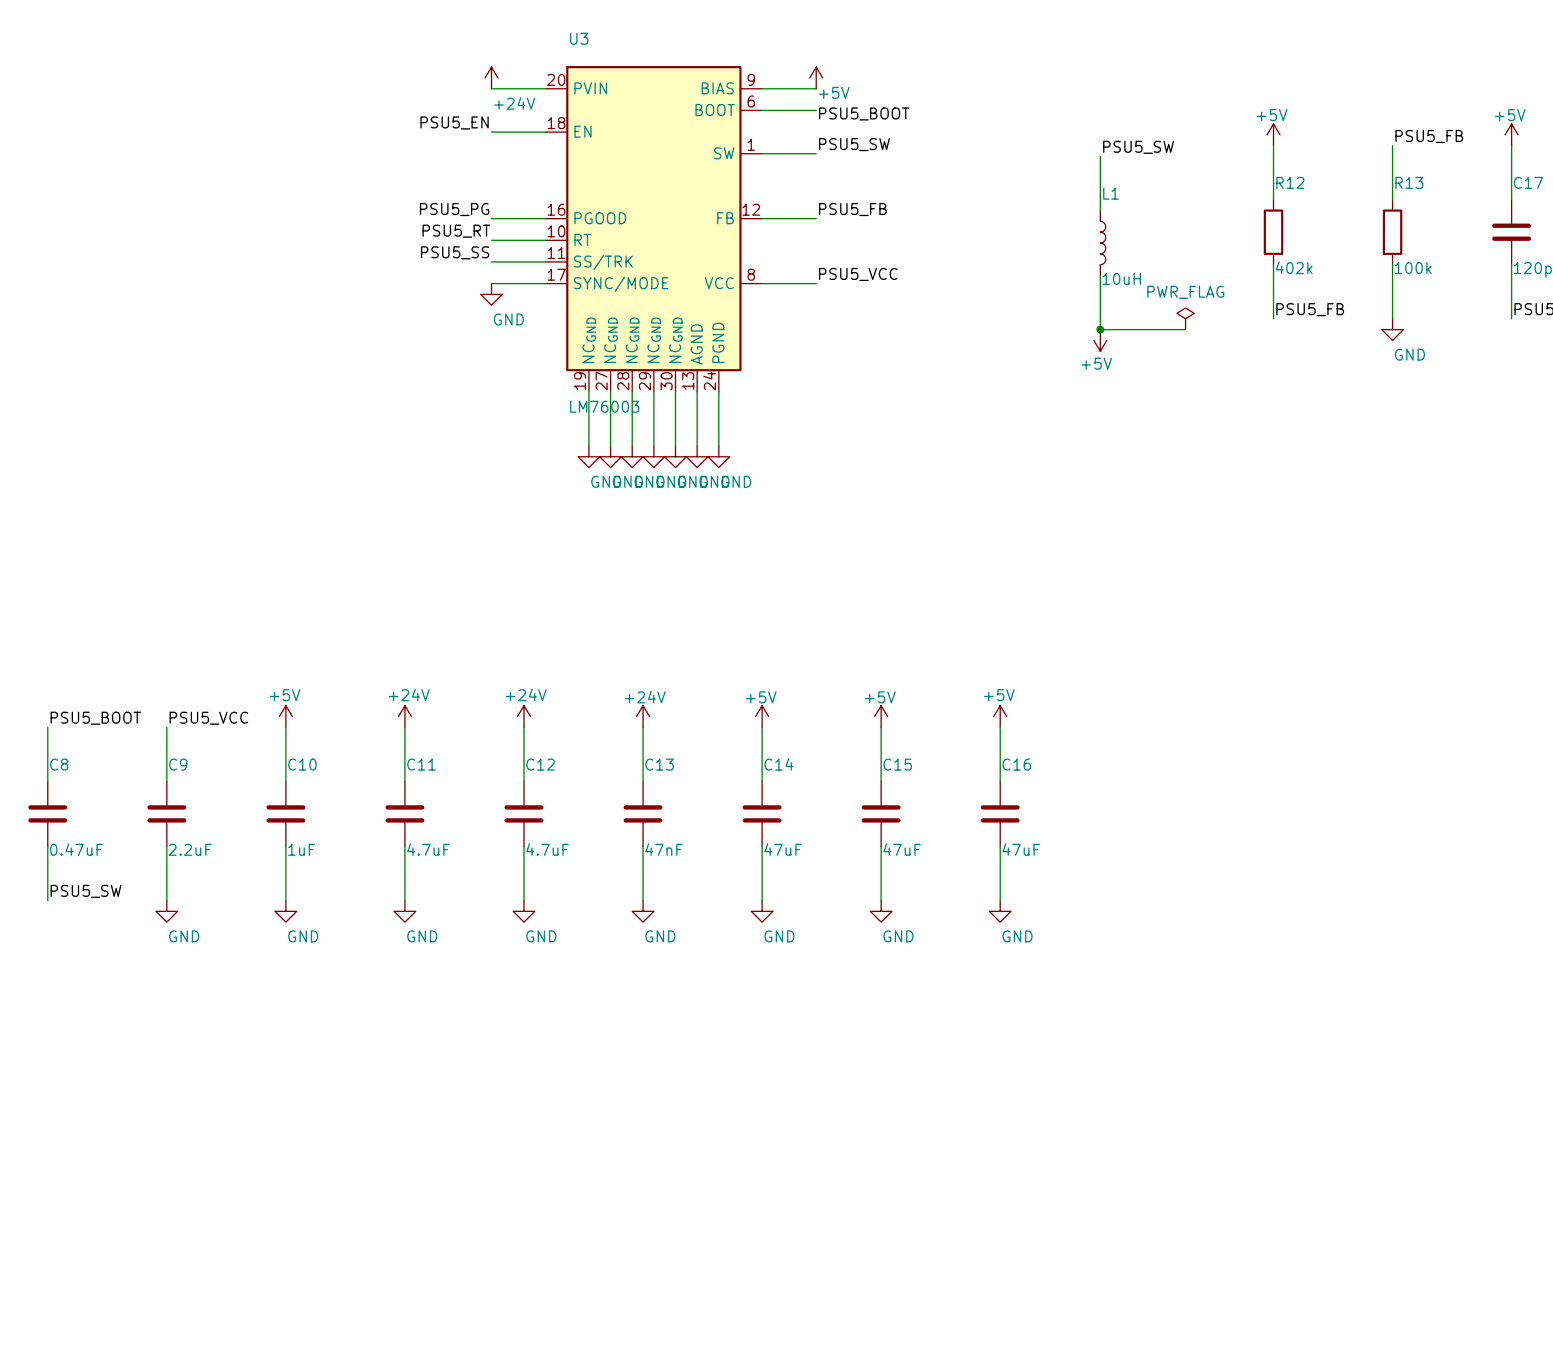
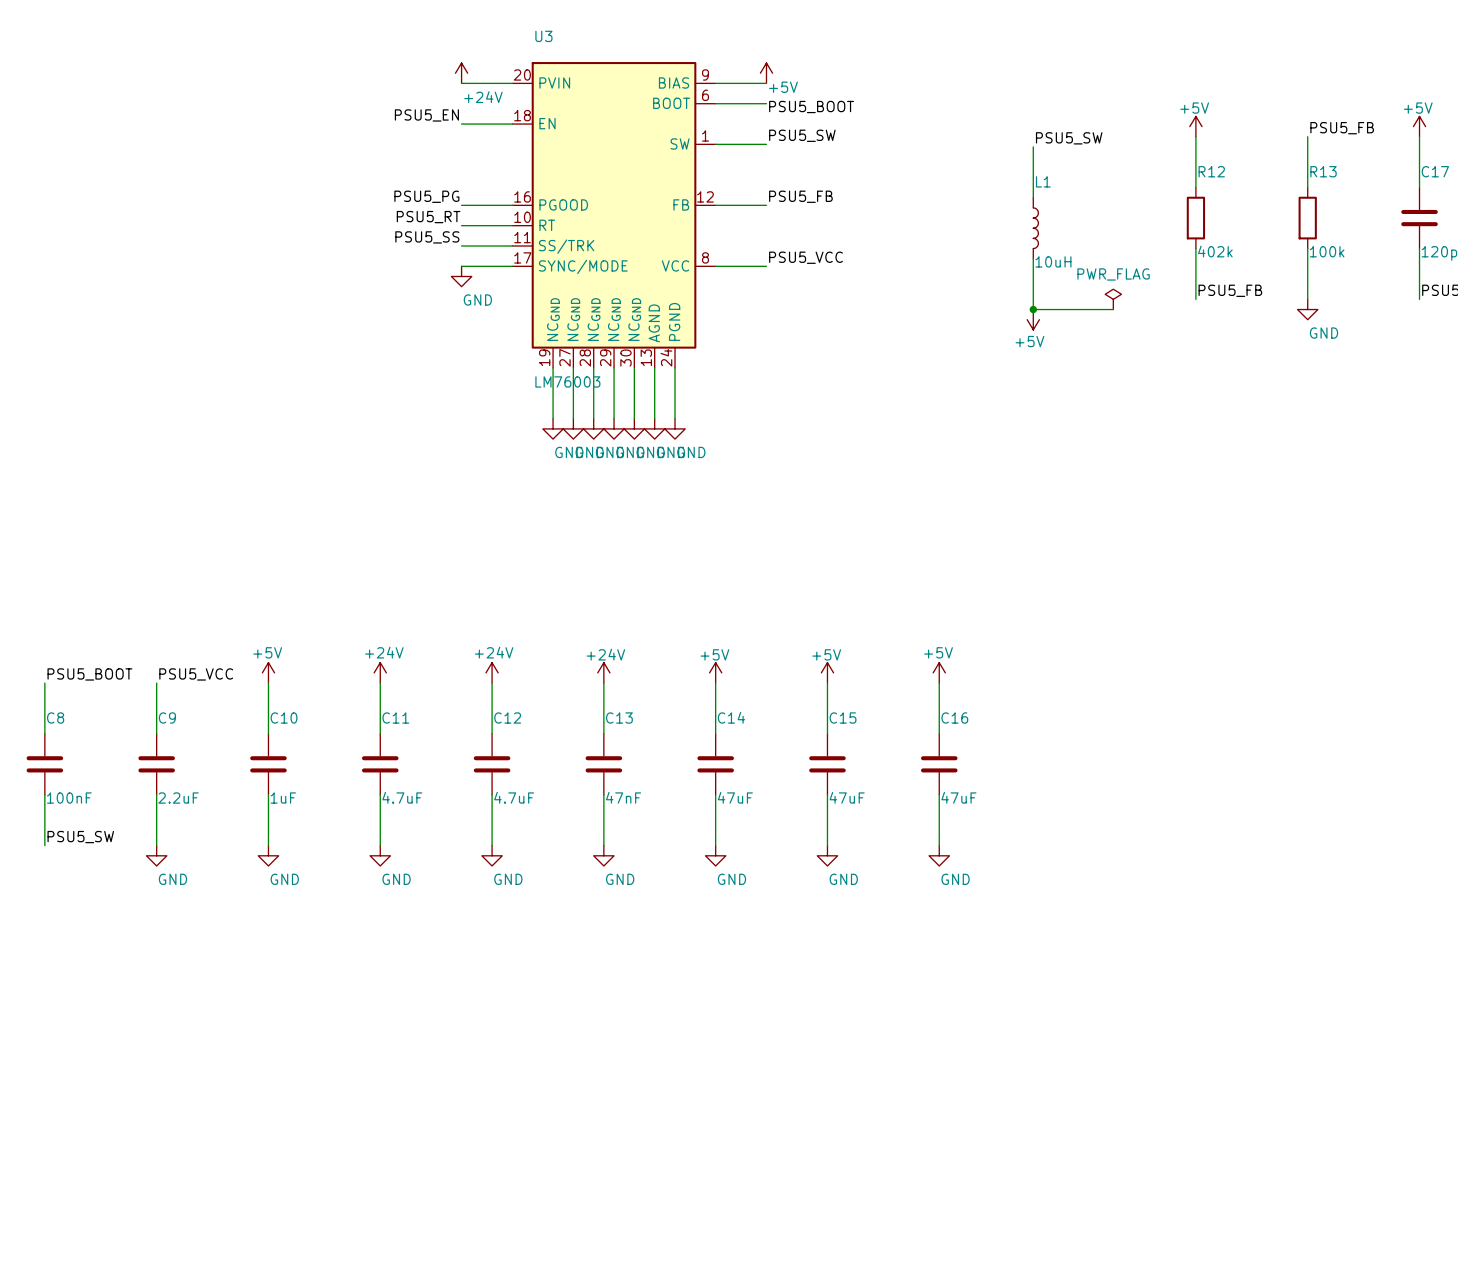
C8 value: 0.47uF (76, 849) -> 100nF (69, 798)

